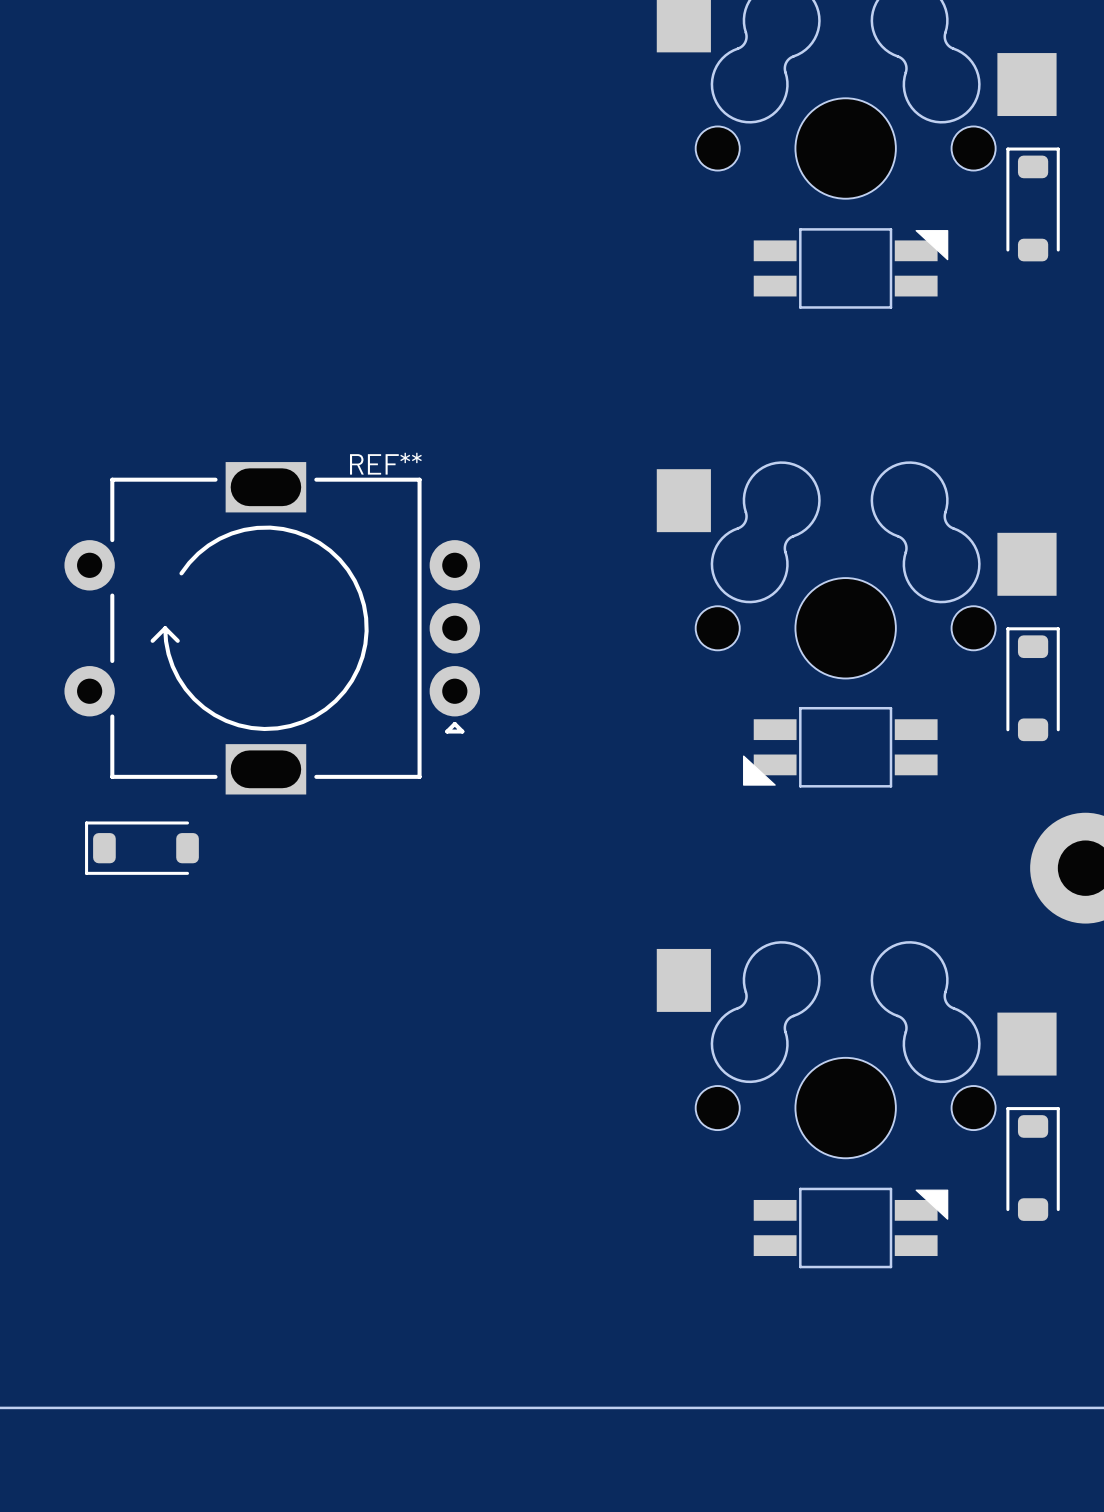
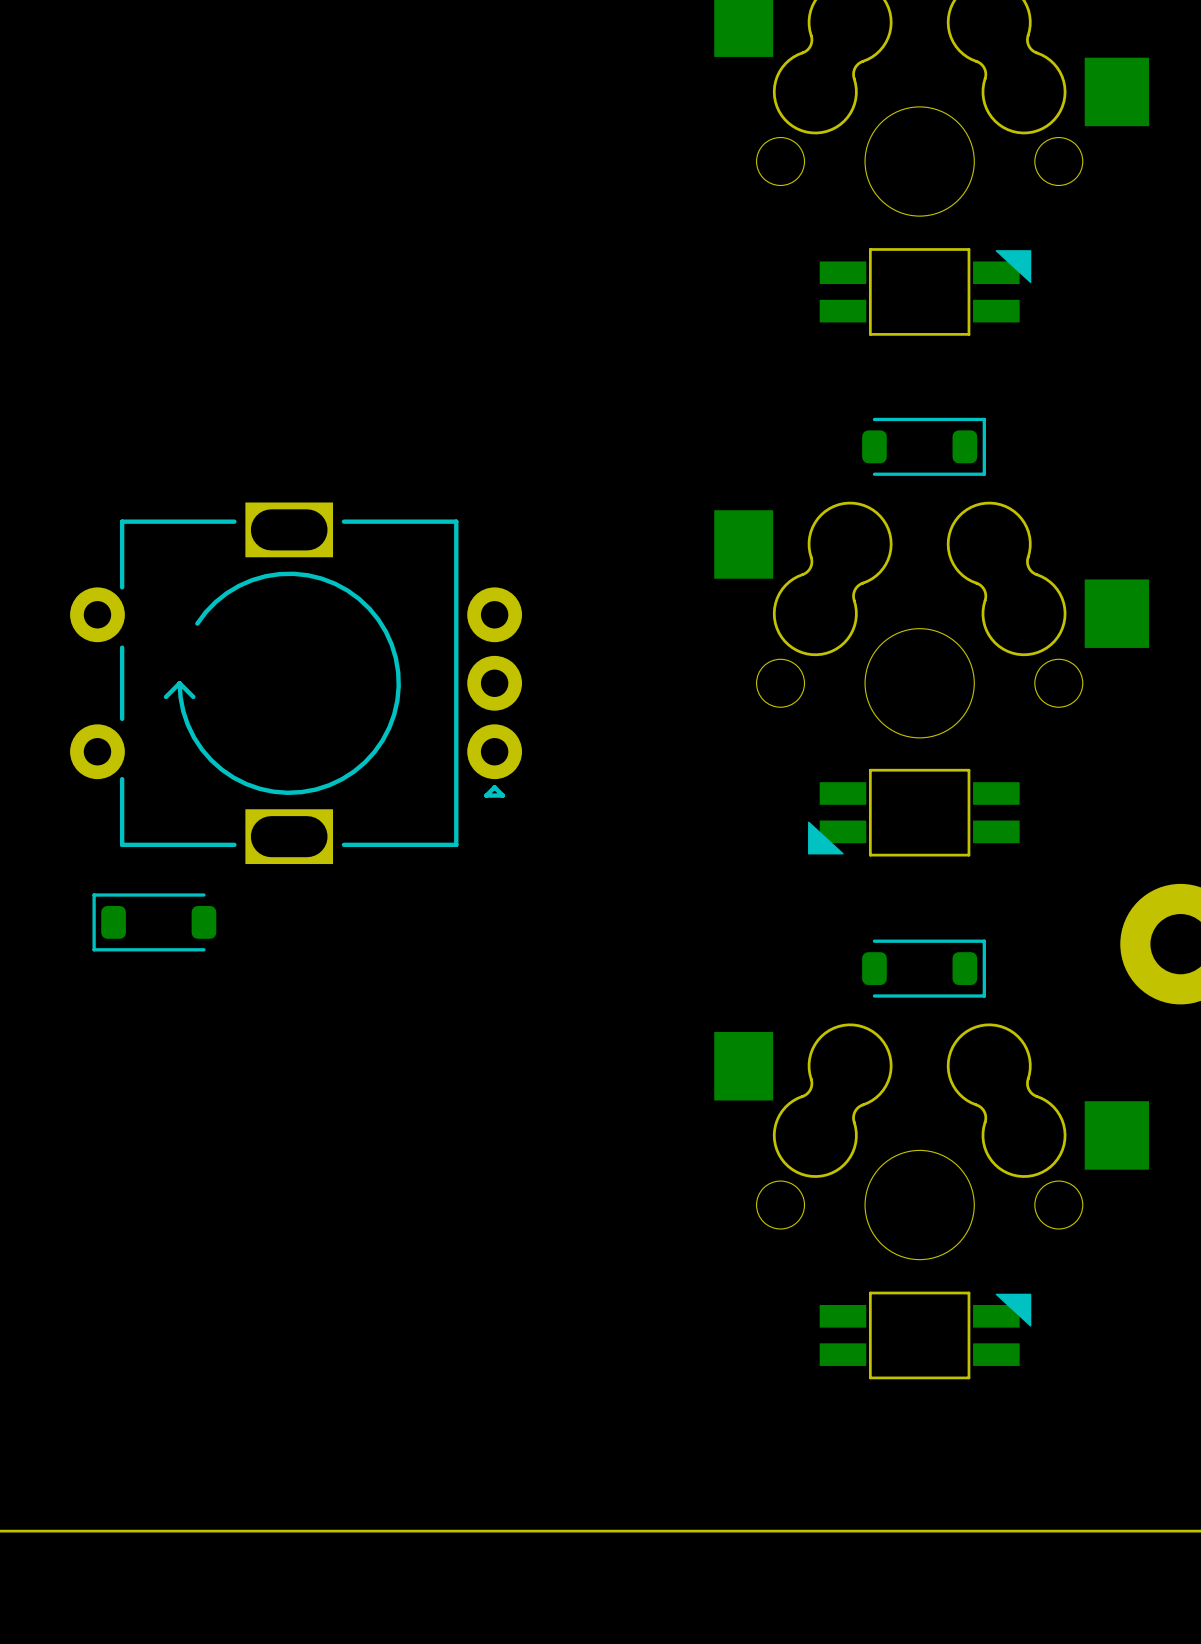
part: (1033, 204) -> none
part: none -> (924, 446)
part text: REF** (385, 463) -> none
part: (1033, 684) -> none
part: none -> (924, 968)
part: (1033, 1163) -> none

